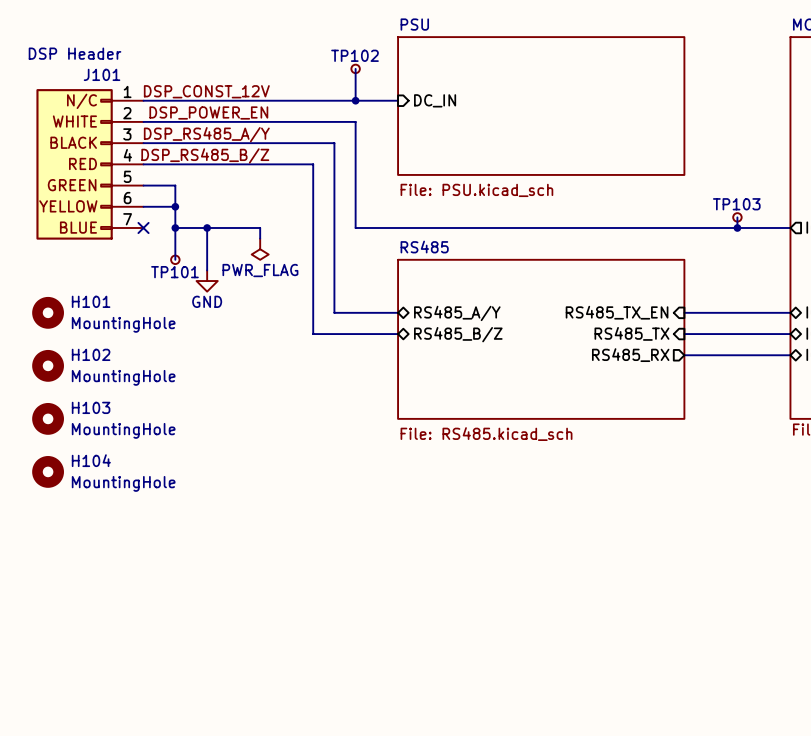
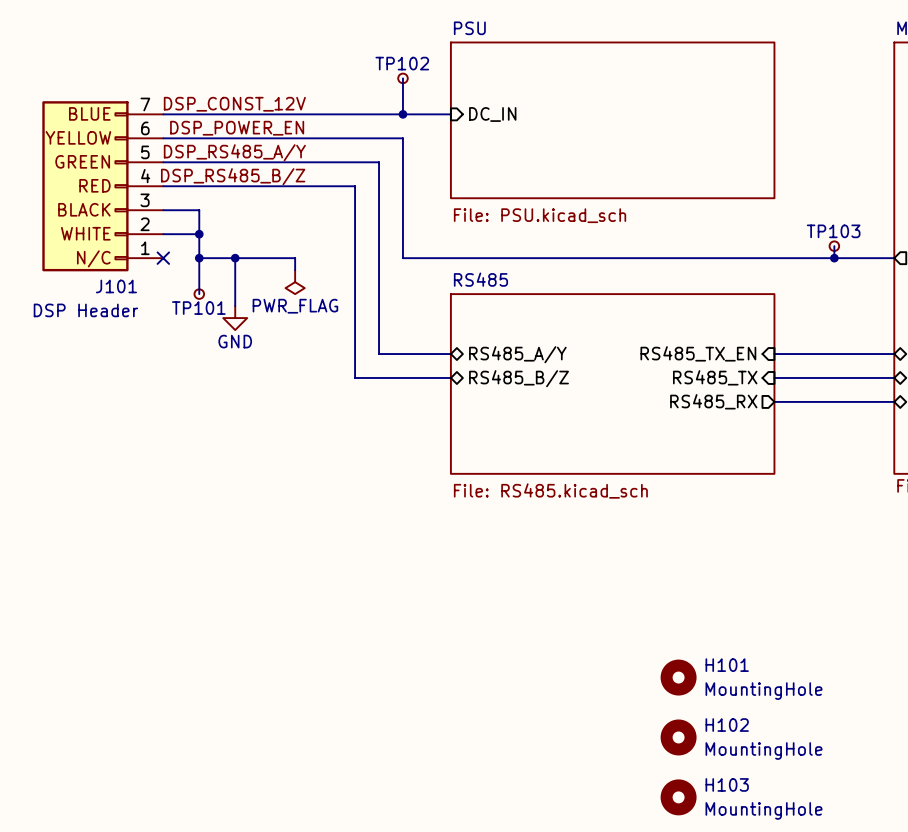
J101 flip: as is (74, 164) -> up-down (85, 186)
H101 position: (48, 312) -> (678, 677)
H102 position: (48, 365) -> (678, 737)
H103 position: (48, 418) -> (678, 797)
H104: MountingHole (48, 471) -> none

